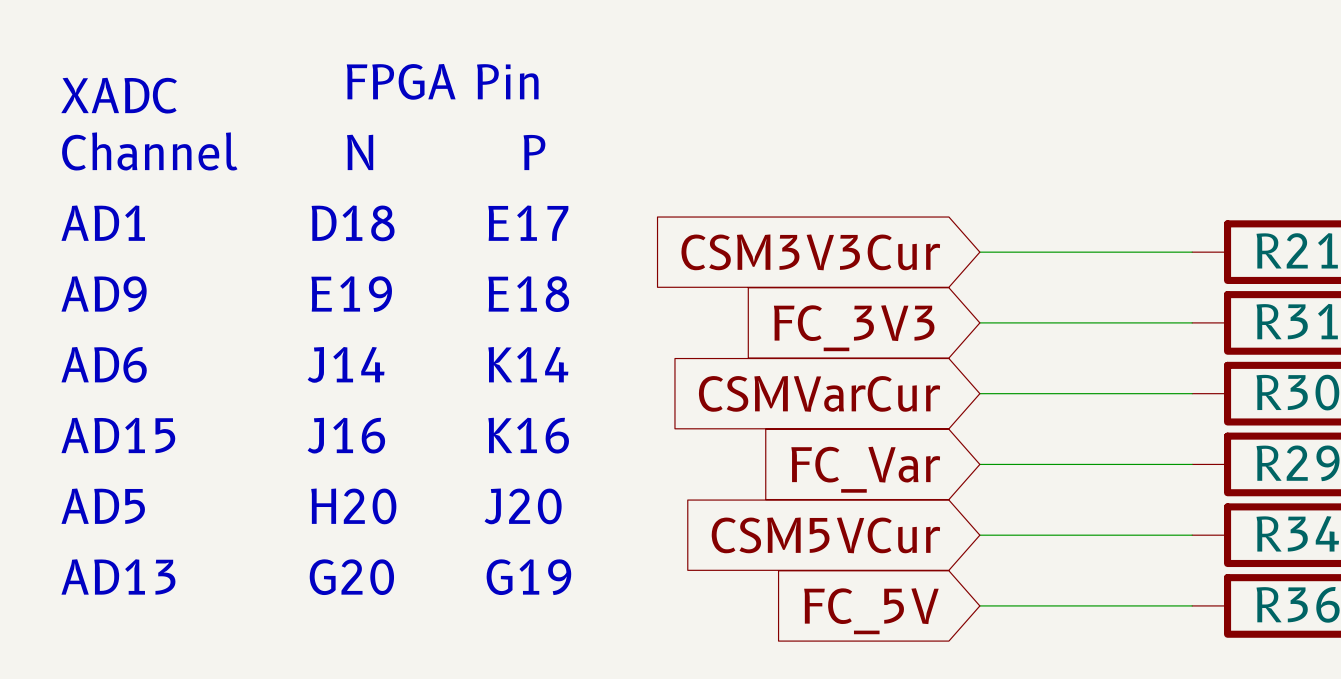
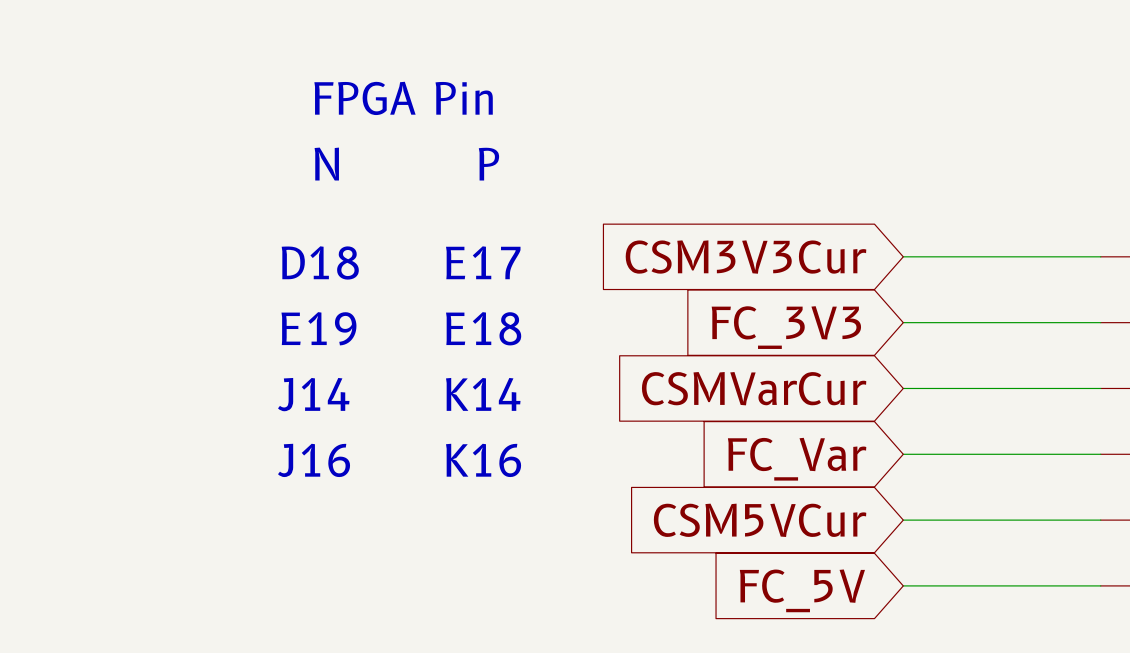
text: XADC (119, 95) -> none
text: Channel (149, 151) -> none
text: AD1 (103, 223) -> none
text position: D18 (353, 223) -> D18 (320, 262)
text position: E17 (528, 223) -> E17 (483, 262)
text: AD9 (104, 294) -> none
text position: E19 (351, 294) -> E19 (318, 328)
text position: E18 (528, 294) -> E18 (483, 328)
text: AD6 (104, 364) -> none
text position: J14 (346, 364) -> J14 (313, 394)
text position: K14 (528, 364) -> K14 (483, 394)
text: AD15 (118, 435) -> none
text position: J16 (346, 435) -> J16 (314, 460)
text position: K16 (528, 435) -> K16 (483, 460)
text: AD5 (103, 506) -> none
text: H20 (353, 506) -> none
text: J20 (523, 506) -> none
text: AD13 (118, 576) -> none
text: G20 (351, 577) -> none
text: G19 (528, 577) -> none

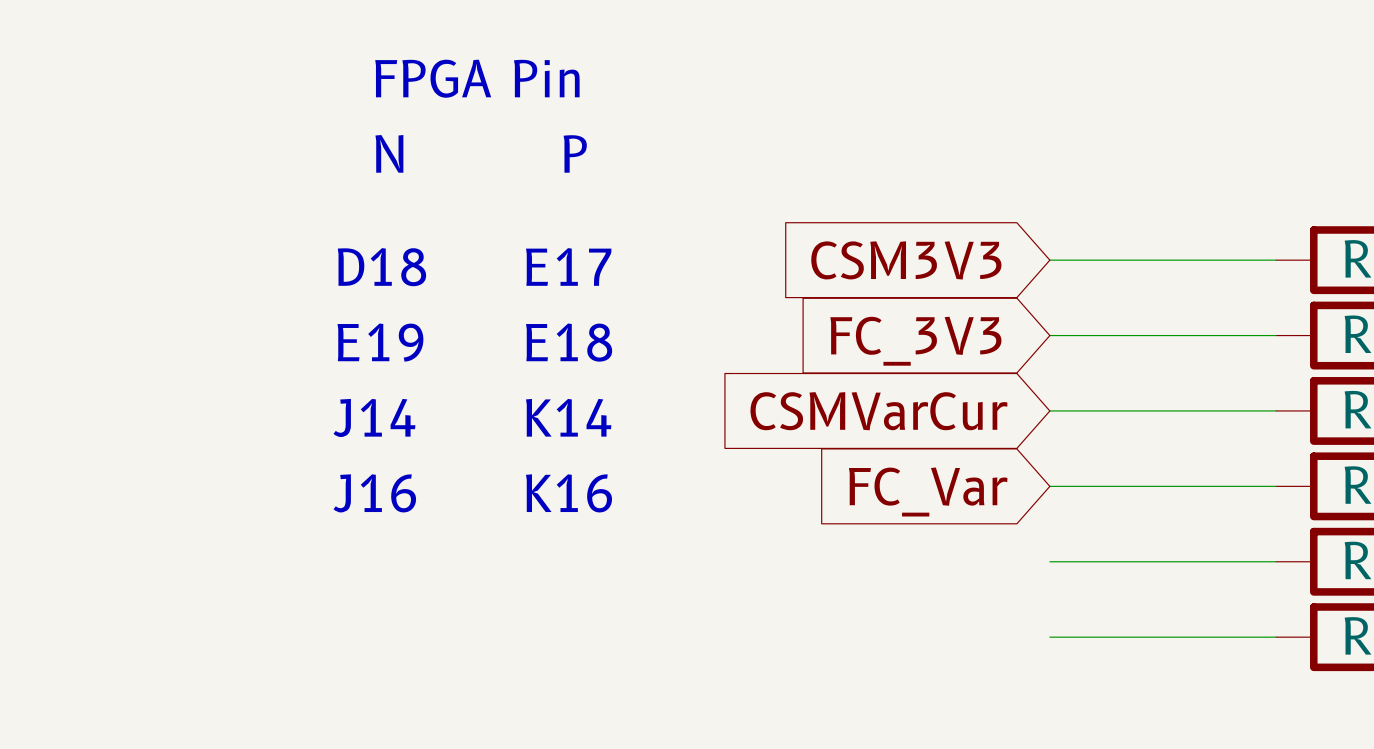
global label: CSM3V3Cur (745, 257) -> CSM3V3 (906, 260)
global label: CSM5VCur (760, 520) -> none
global label: FC_5V (802, 590) -> none

